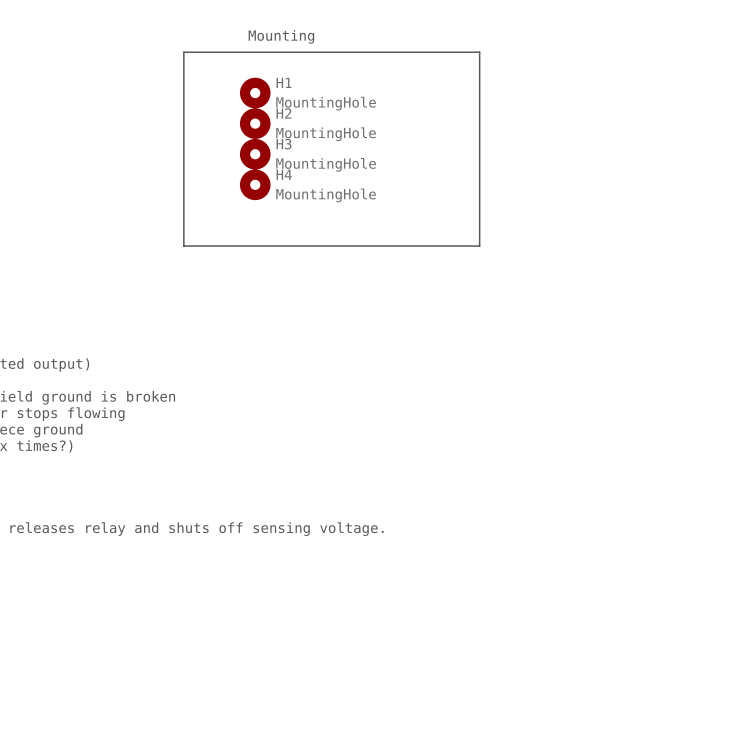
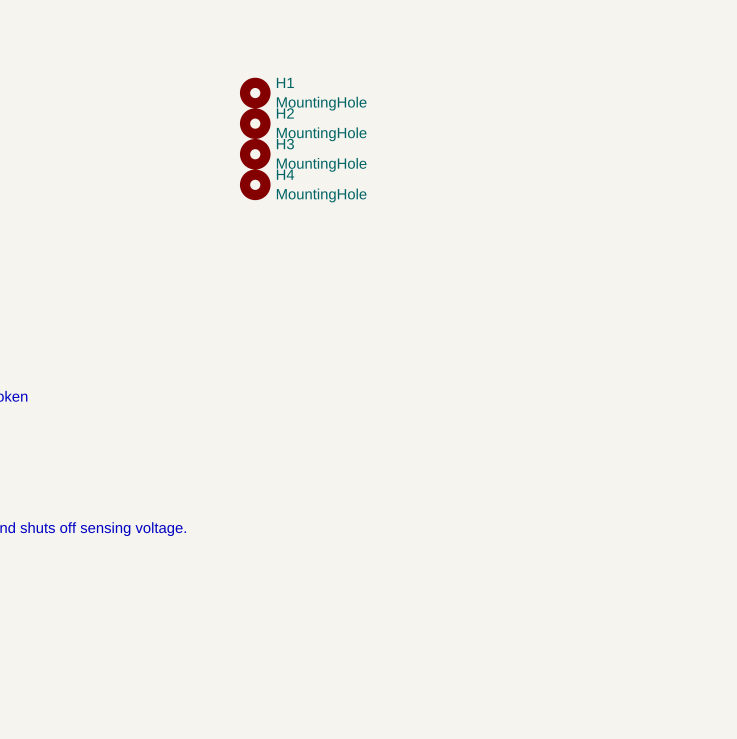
text: Mounting (281, 36) -> none
line: (183, 52) (479, 52) (479, 246) (183, 246) (183, 52) -> none

